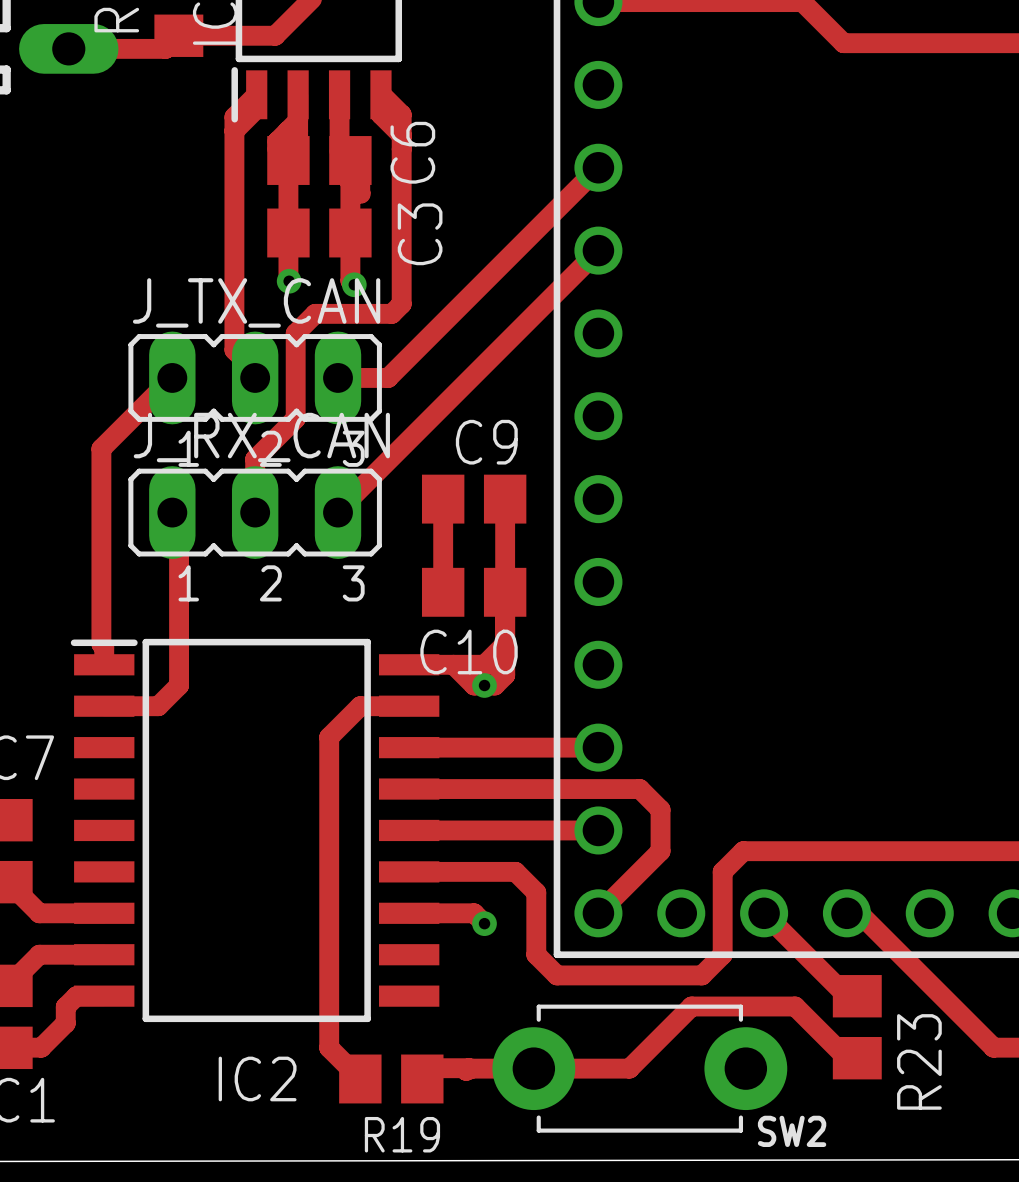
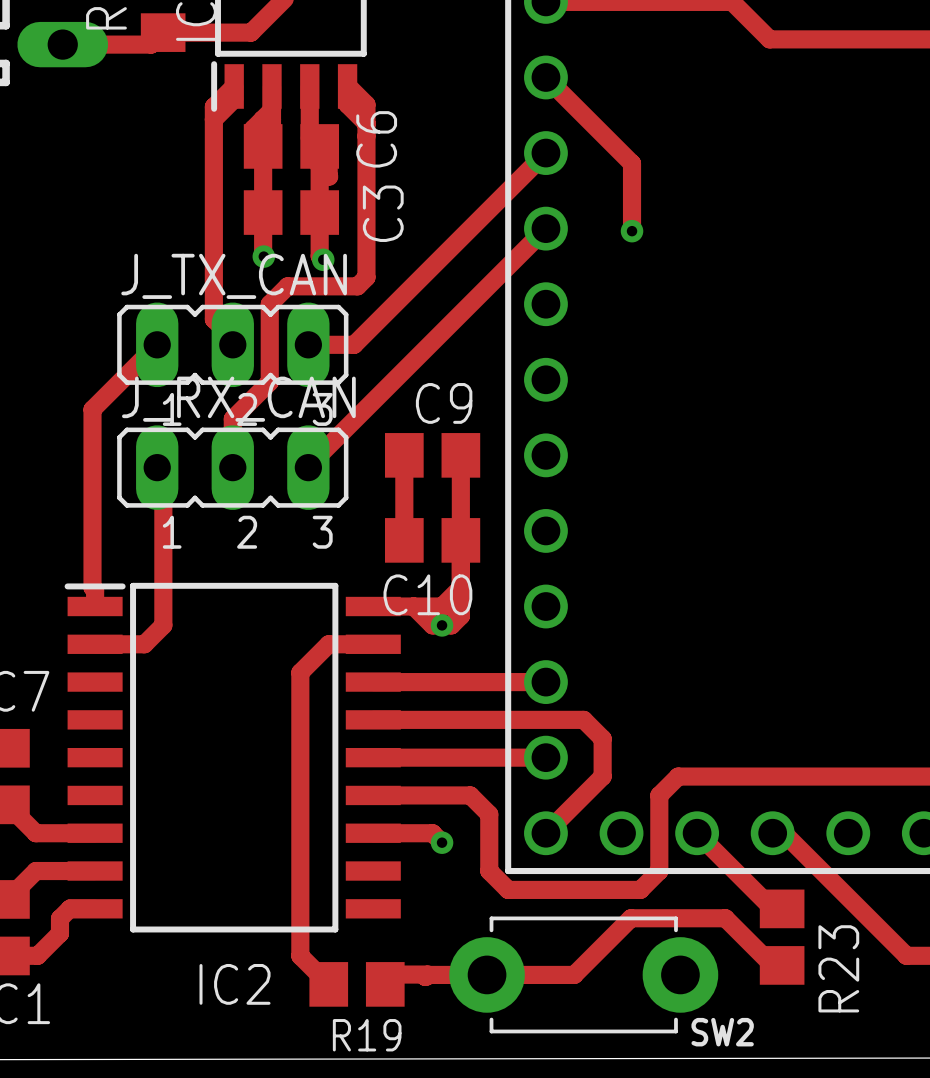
track: none -> (545, 77) (632, 163) (632, 231)
via: none -> (632, 231)

